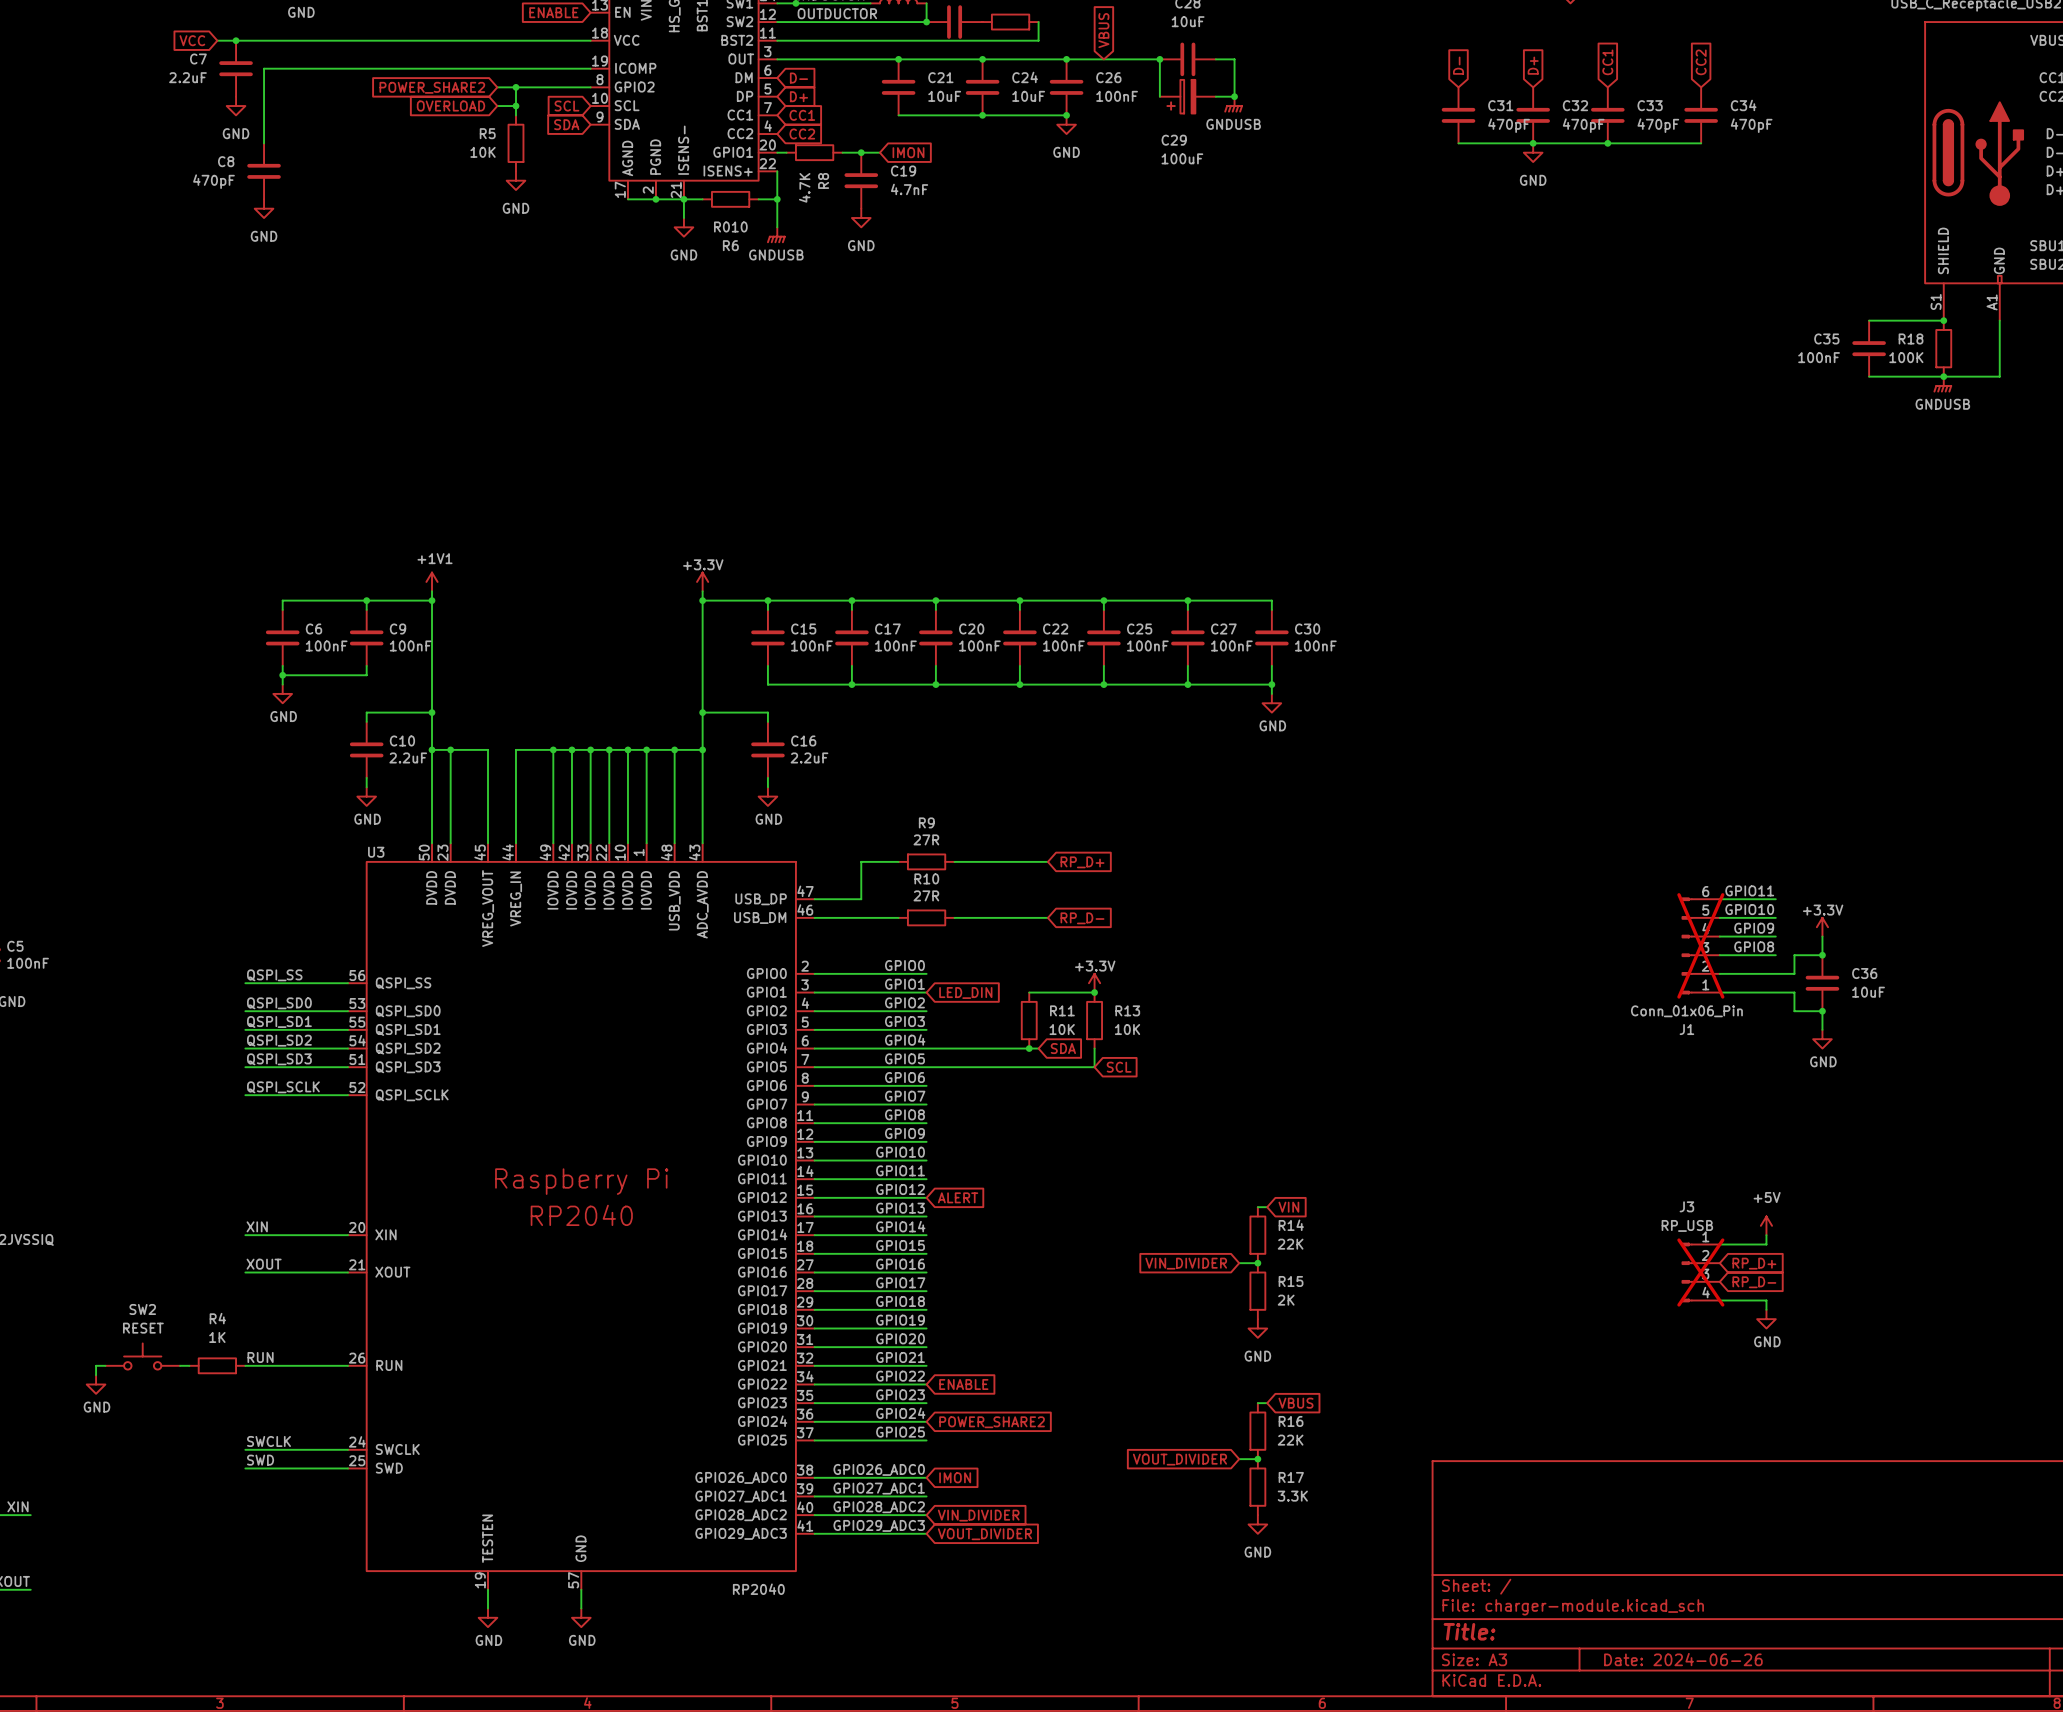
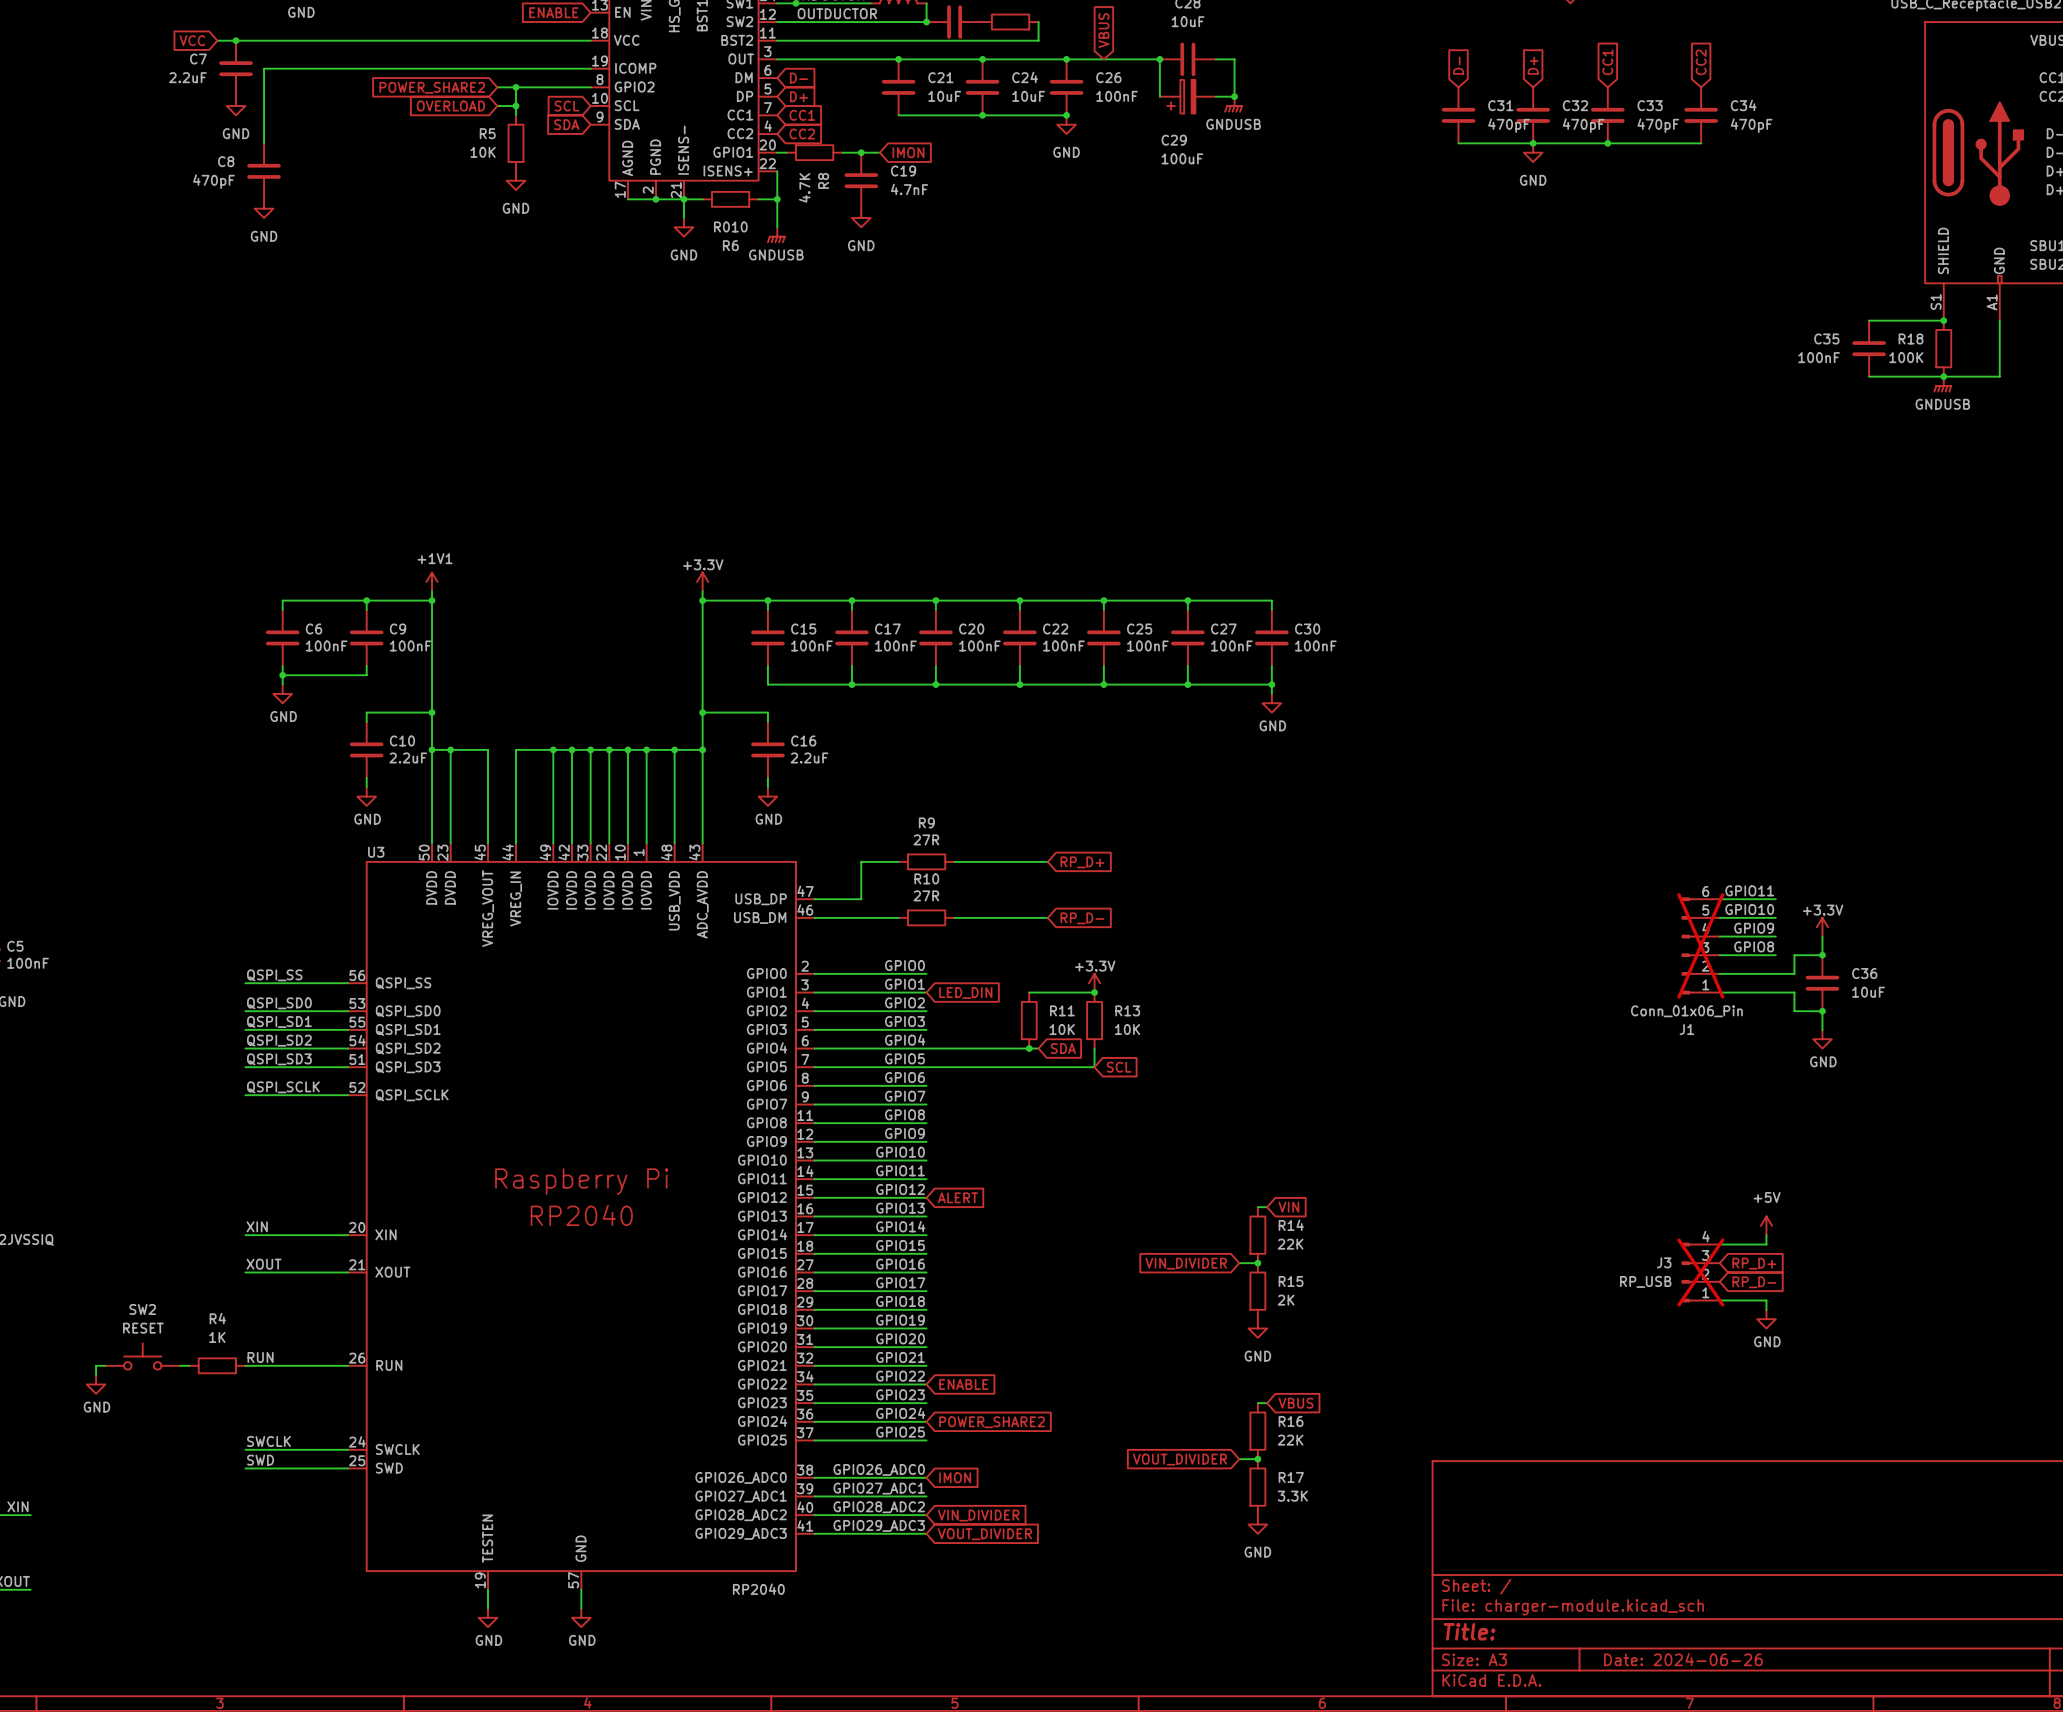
J3 name position: J3 (1686, 1206) -> J3 (1664, 1262)
J3 value position: RP_USB (1687, 1225) -> RP_USB (1645, 1281)
J3 flip: as is (1687, 1272) -> up-down (1687, 1272)

